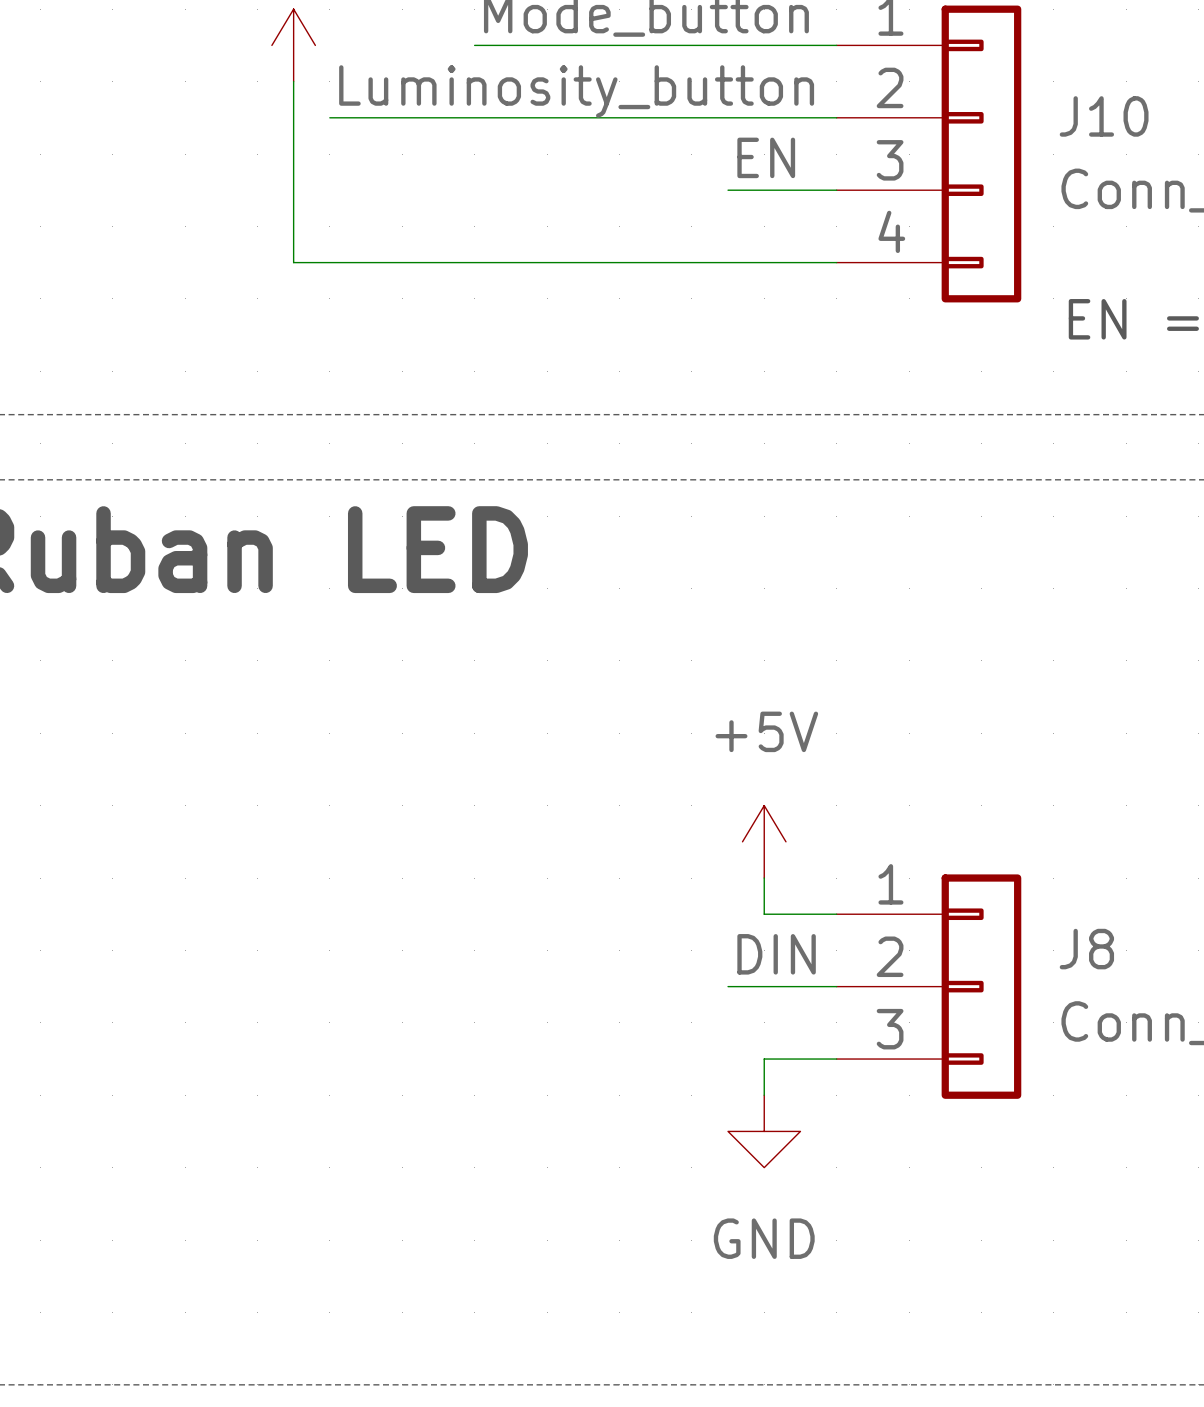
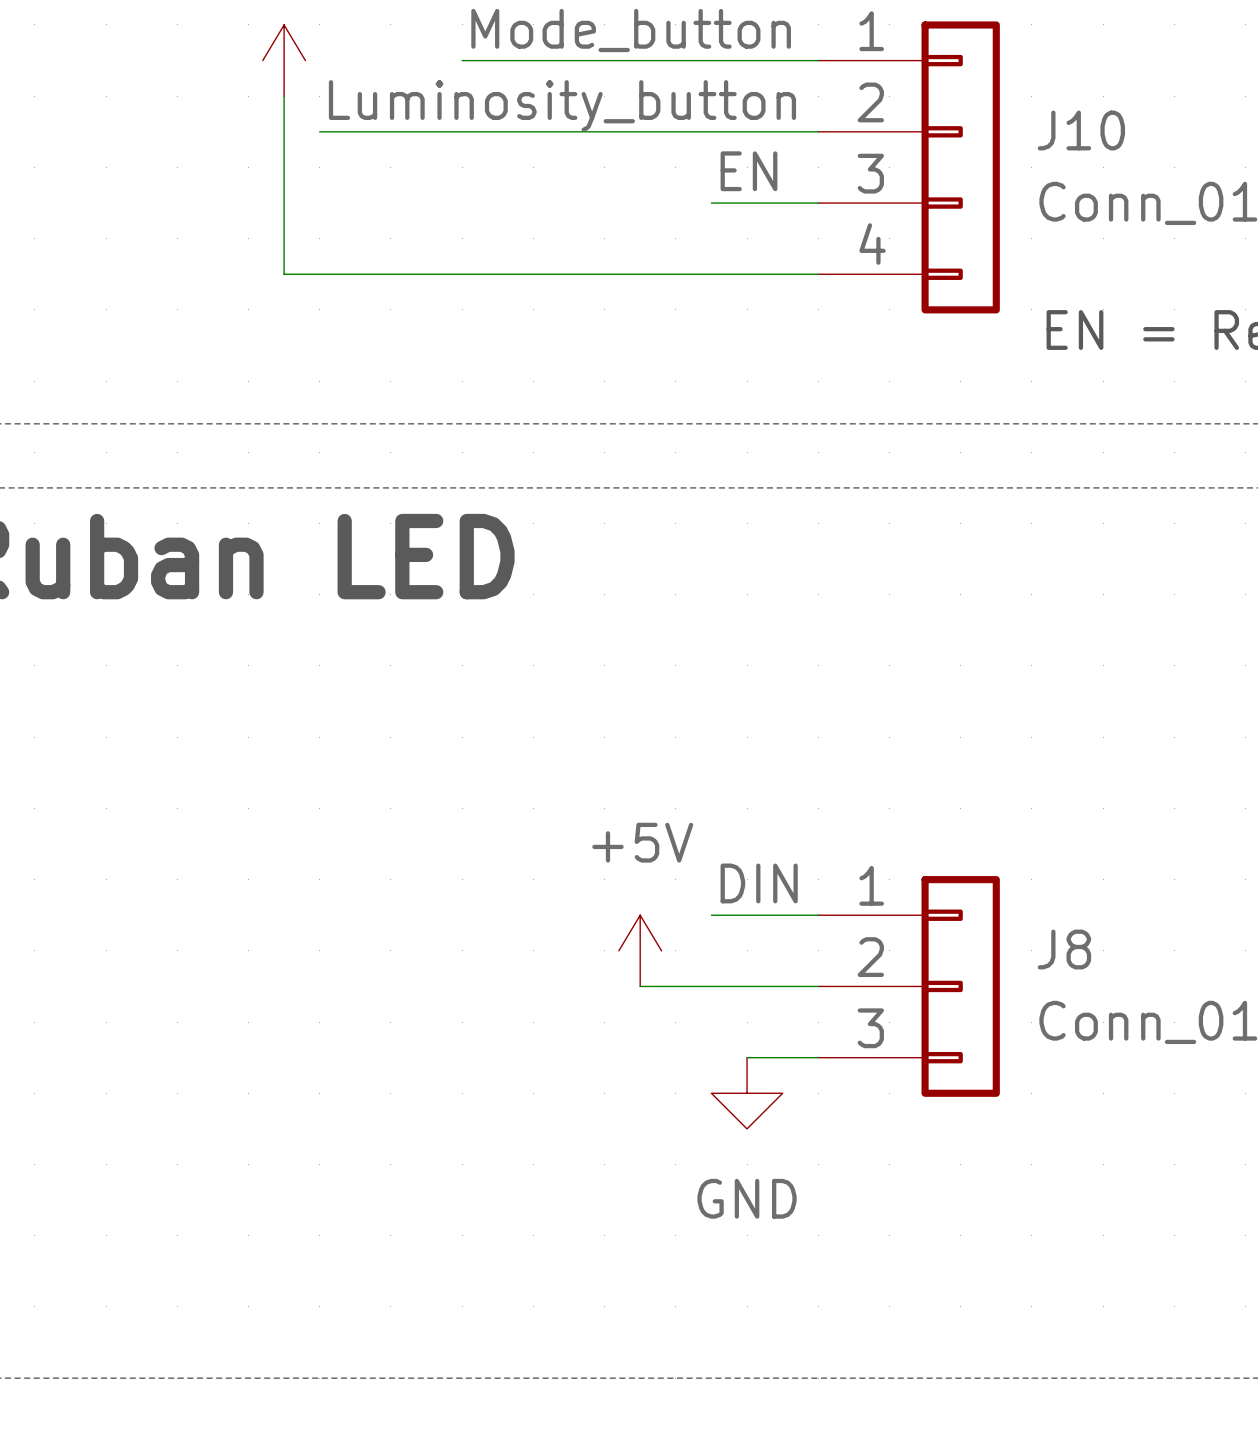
power symbol position: +5V (764, 841) -> +5V (640, 950)
wire: (764, 878) (764, 914) -> (711, 915) (747, 915)
label position: DIN (776, 954) -> DIN (759, 883)
wire: none -> (640, 986) (711, 986)
power symbol position: GND (764, 1131) -> GND (747, 1093)

